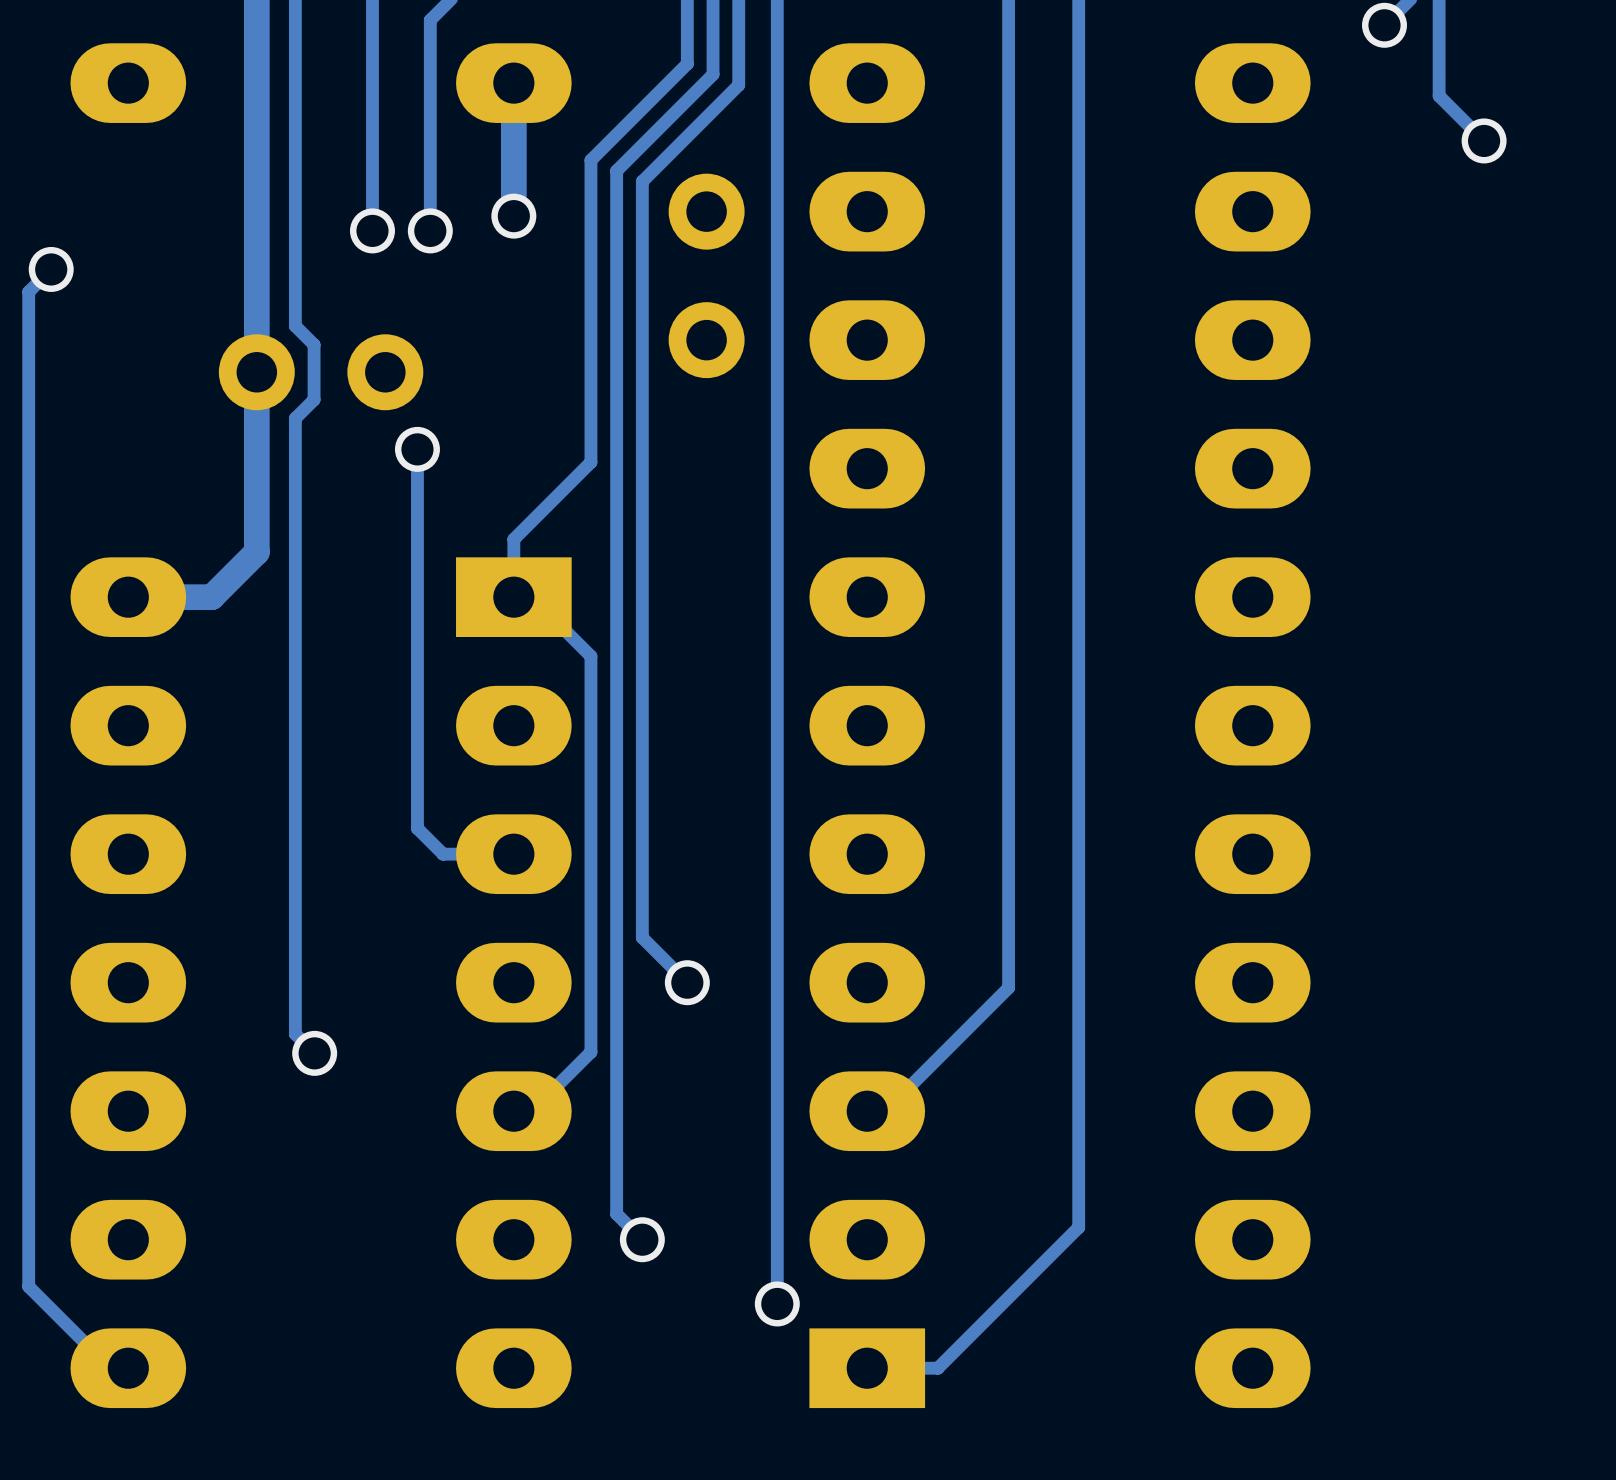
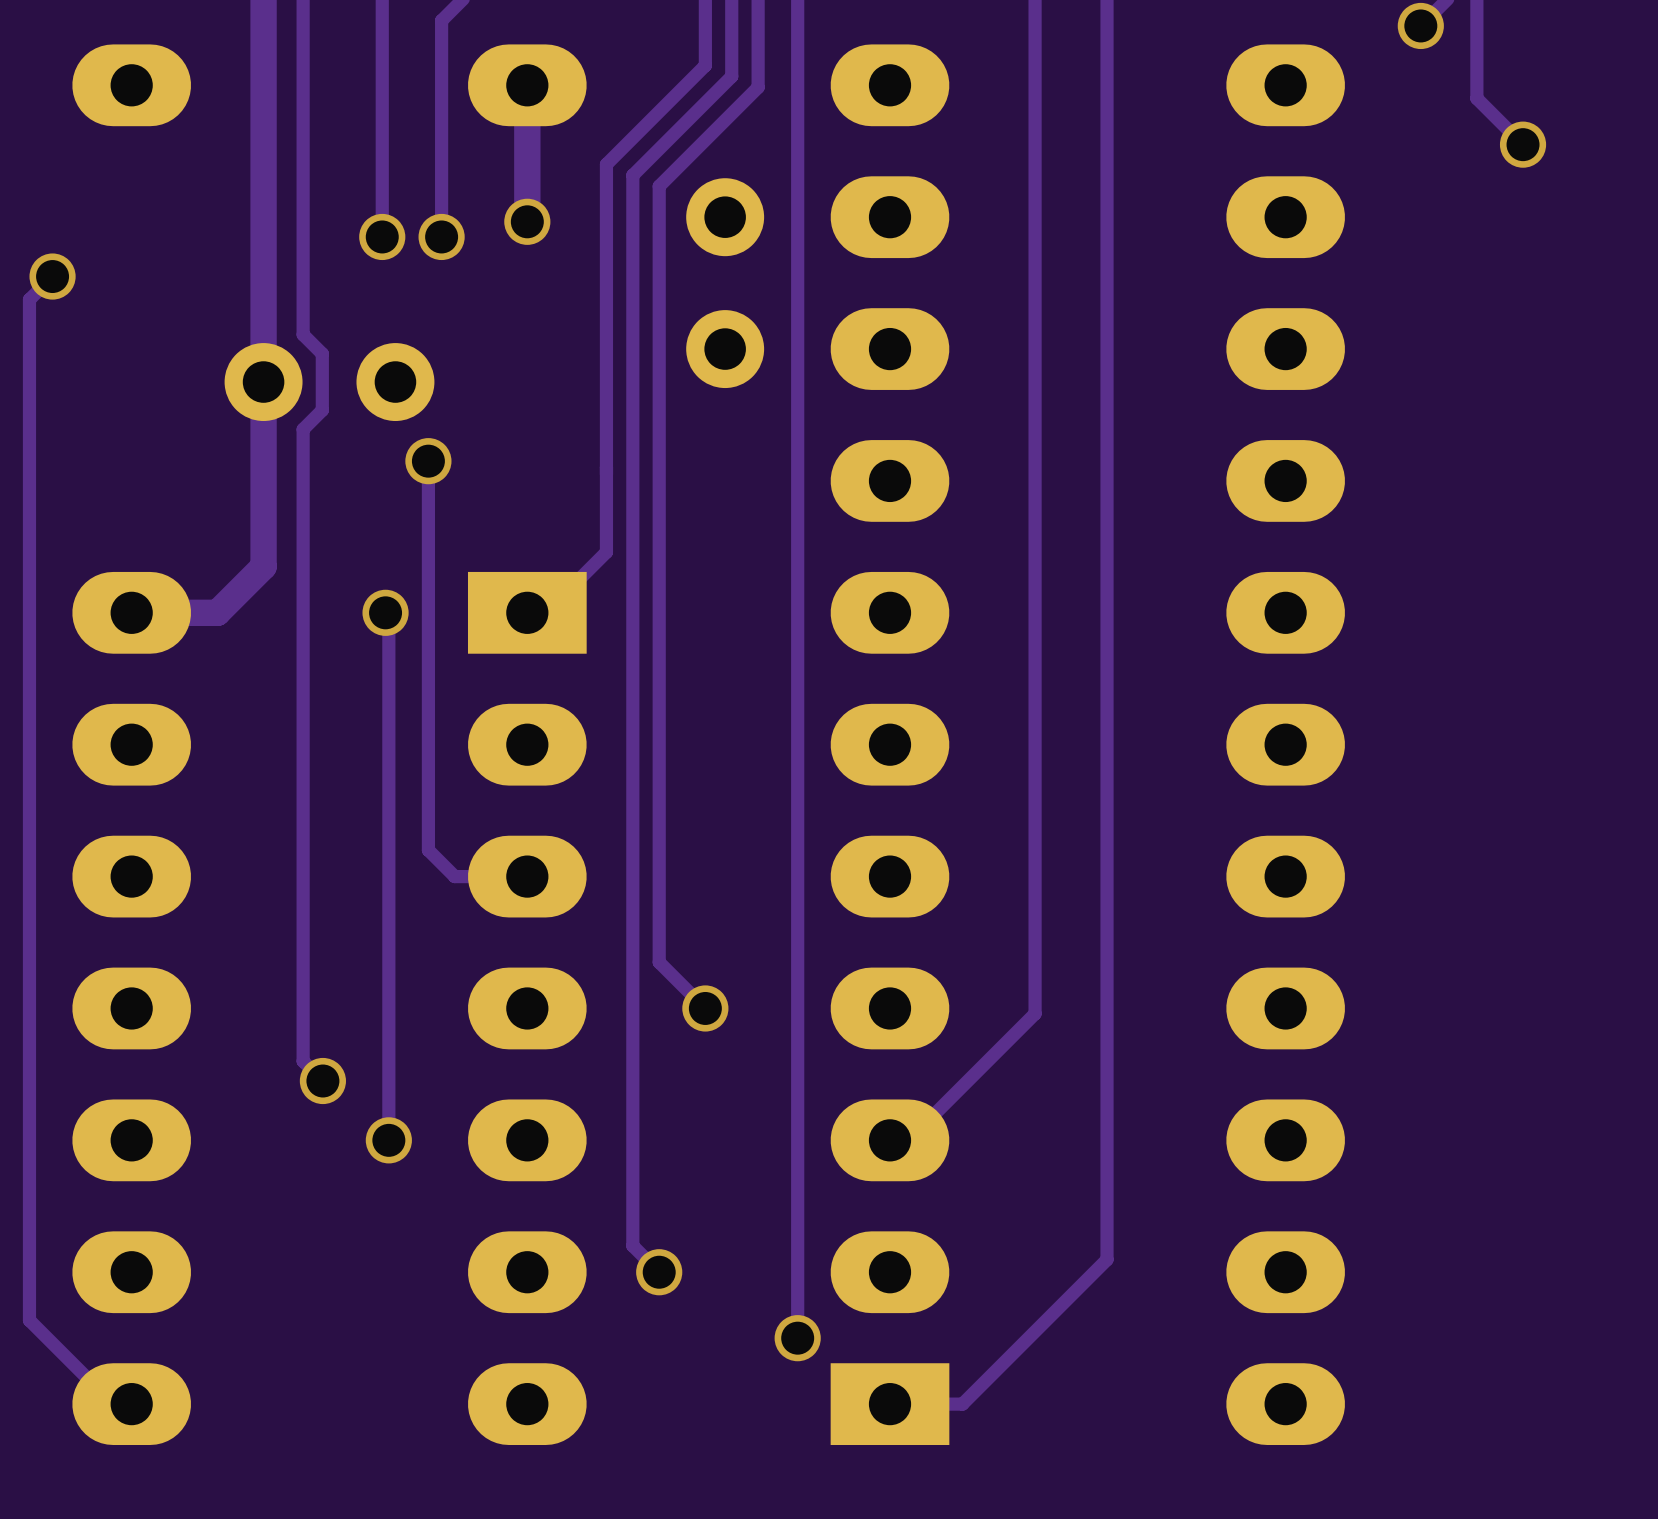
track: (590, 462) (513, 539) (513, 597) -> (606, 474) (606, 552) (545, 612)
track: none -> (385, 612) (388, 616) (388, 1140)
via: none -> (385, 612)
track: (531, 597) (590, 656) (590, 1052) (531, 1111) (513, 1111) -> none
via: none -> (388, 1140)

